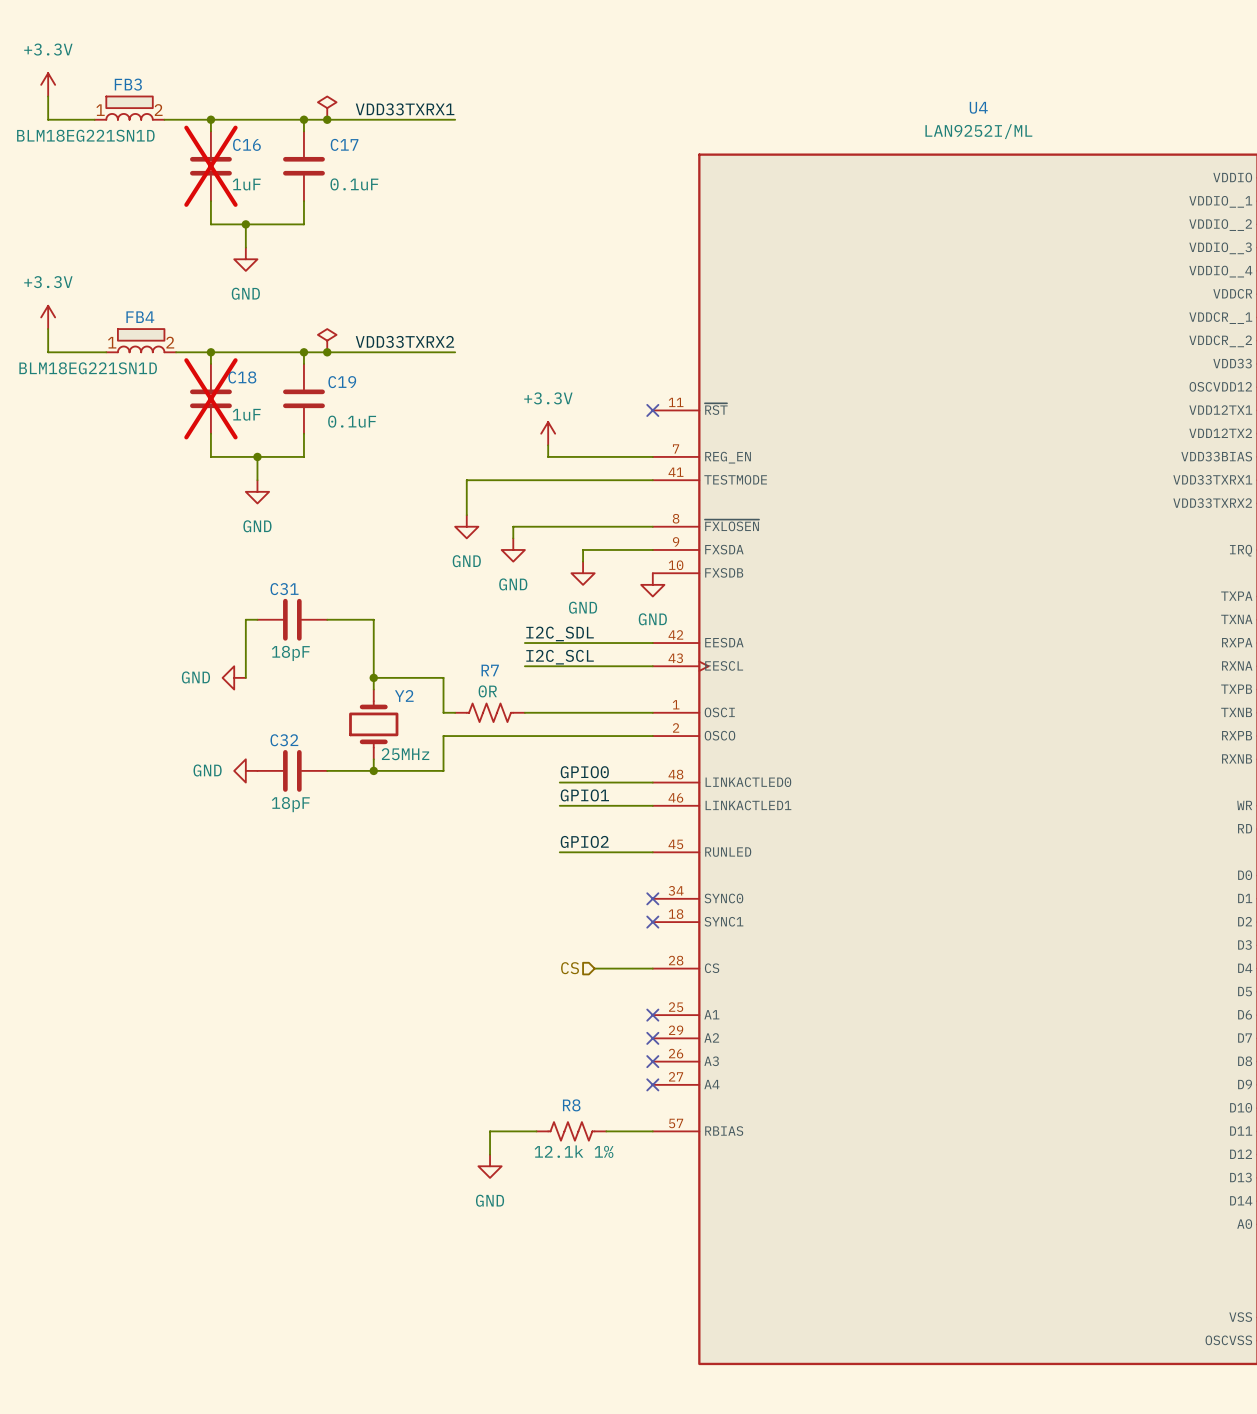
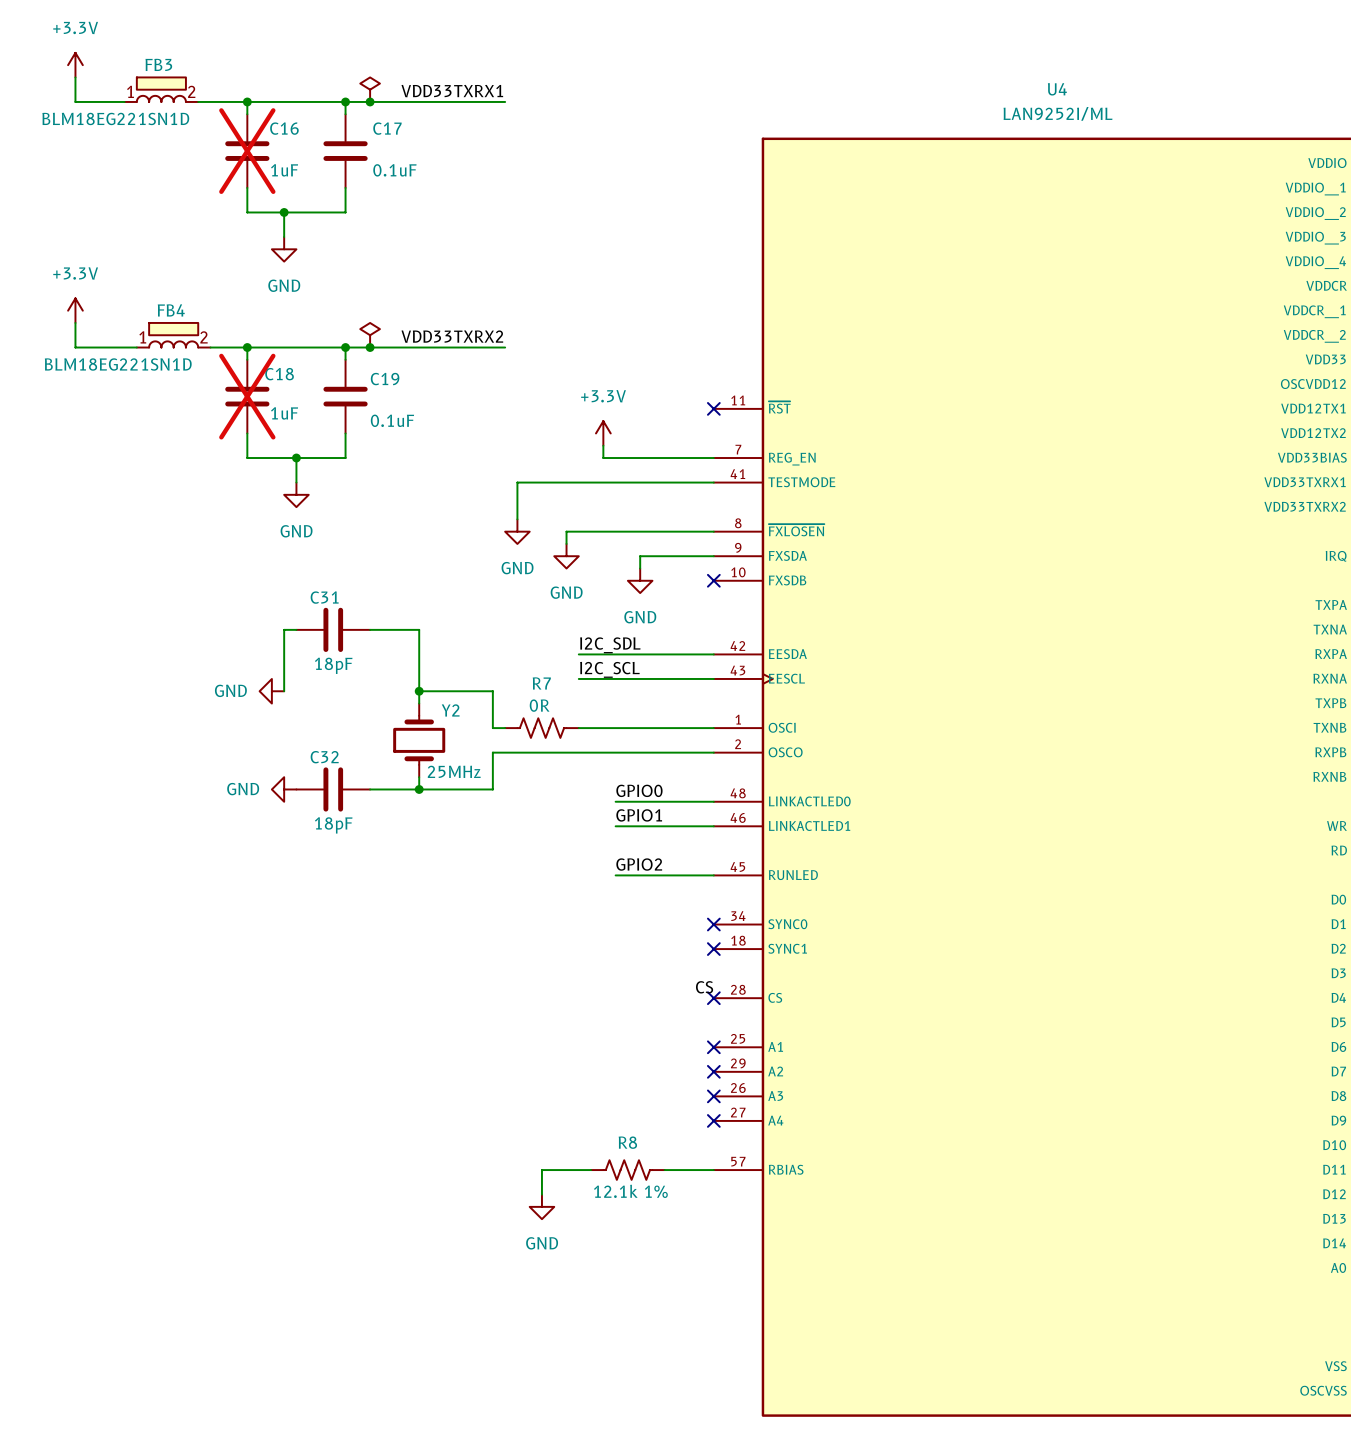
no-connect mark: none -> (713, 580)
power symbol: GND (652, 584) -> none
label: none -> CS (704, 987)
hierarchical label: CS (570, 968) -> none
wire: (594, 968) (652, 968) -> none
no-connect mark: none -> (713, 998)

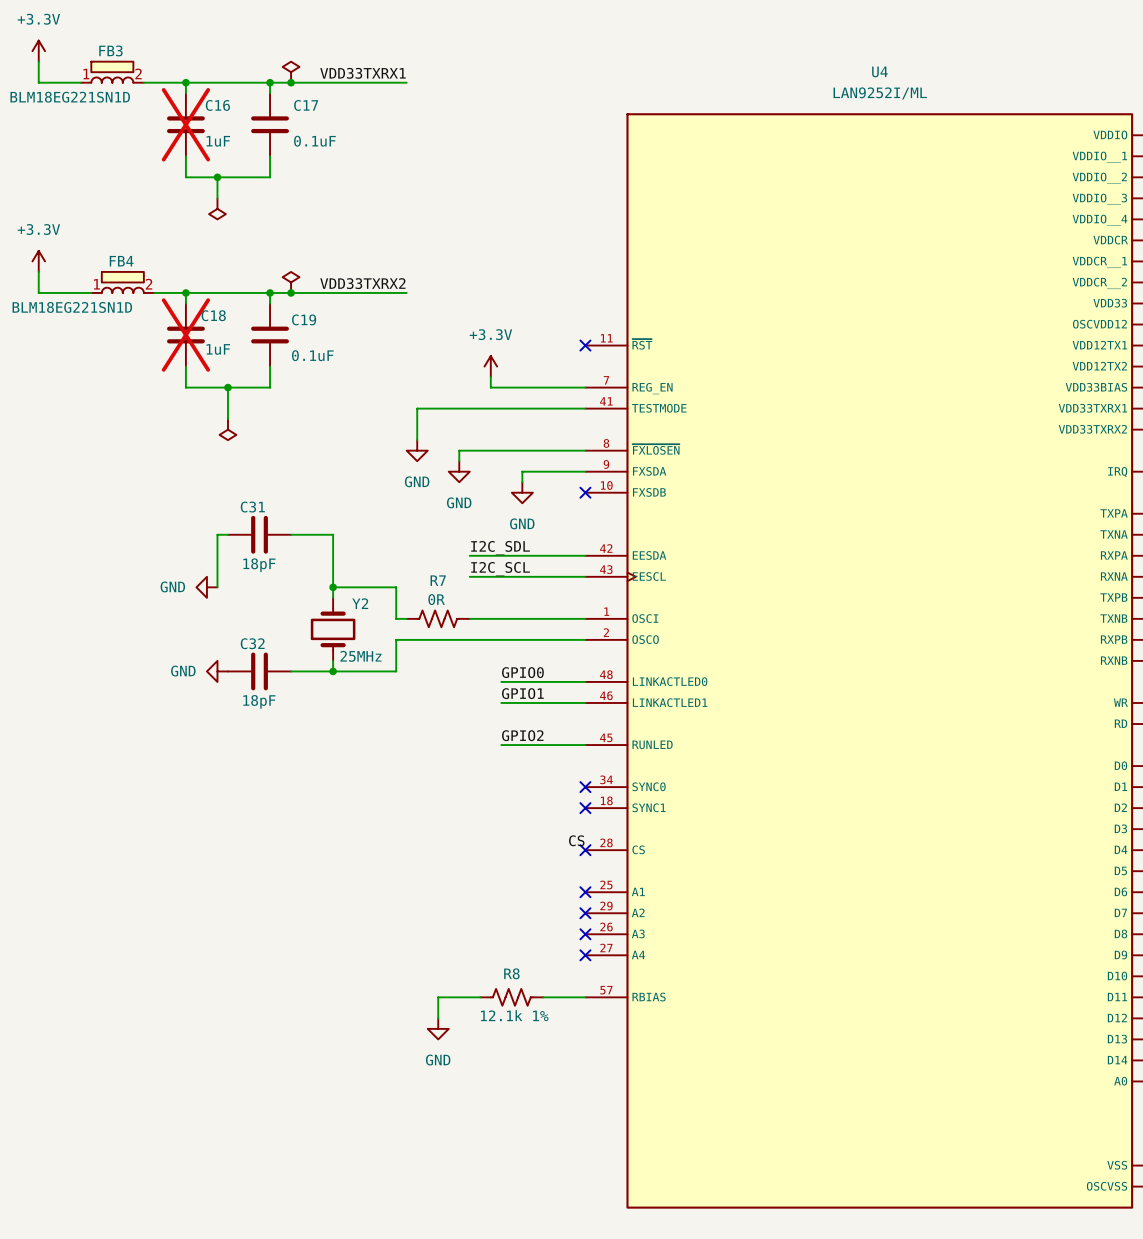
power symbol shape: [271, 237, 297, 262] -> [209, 198, 226, 220]
power symbol text: GND (284, 285) -> none
power symbol: GND (296, 494) -> none
power symbol: none -> (227, 429)

